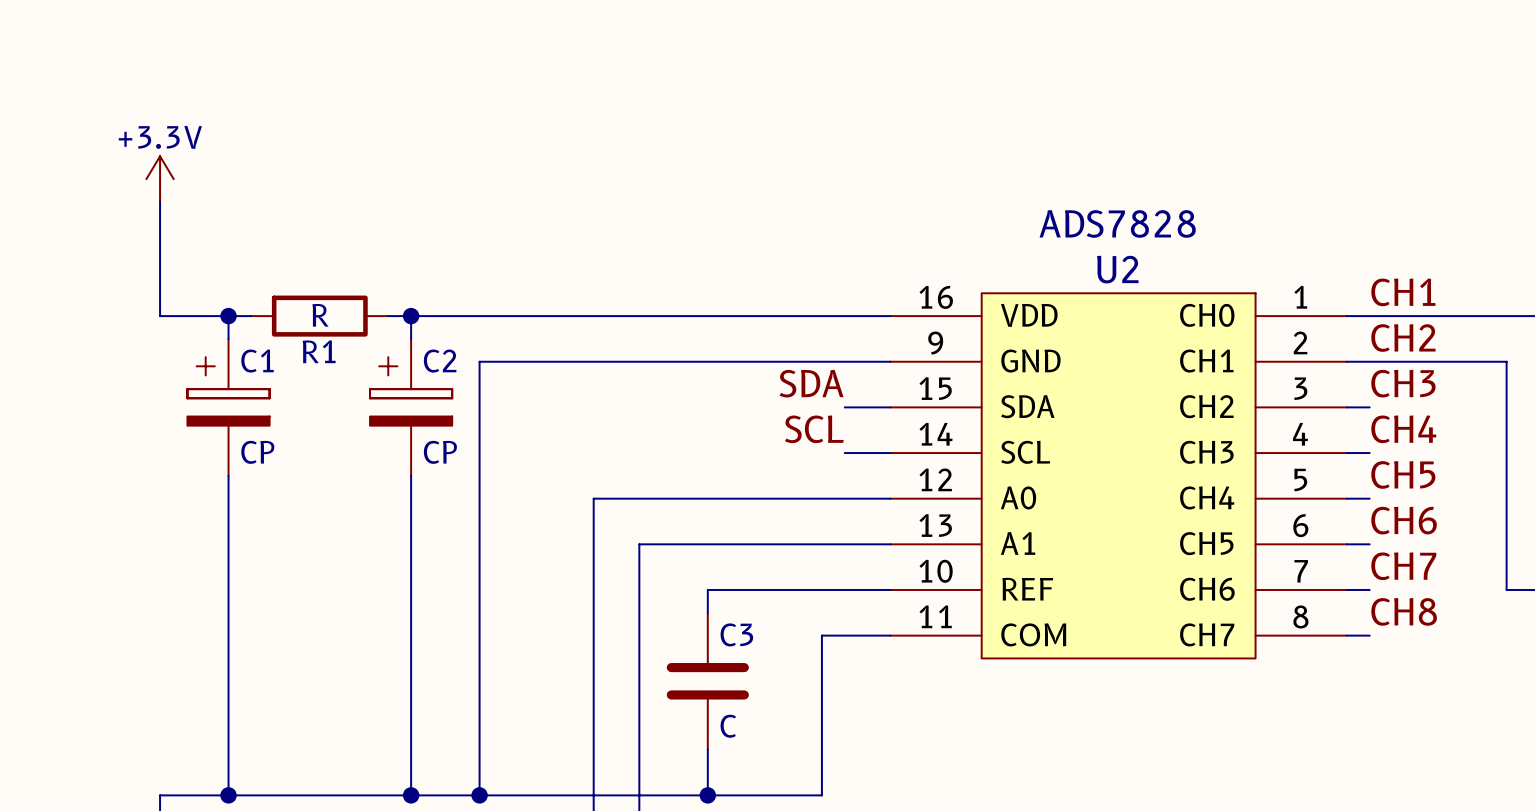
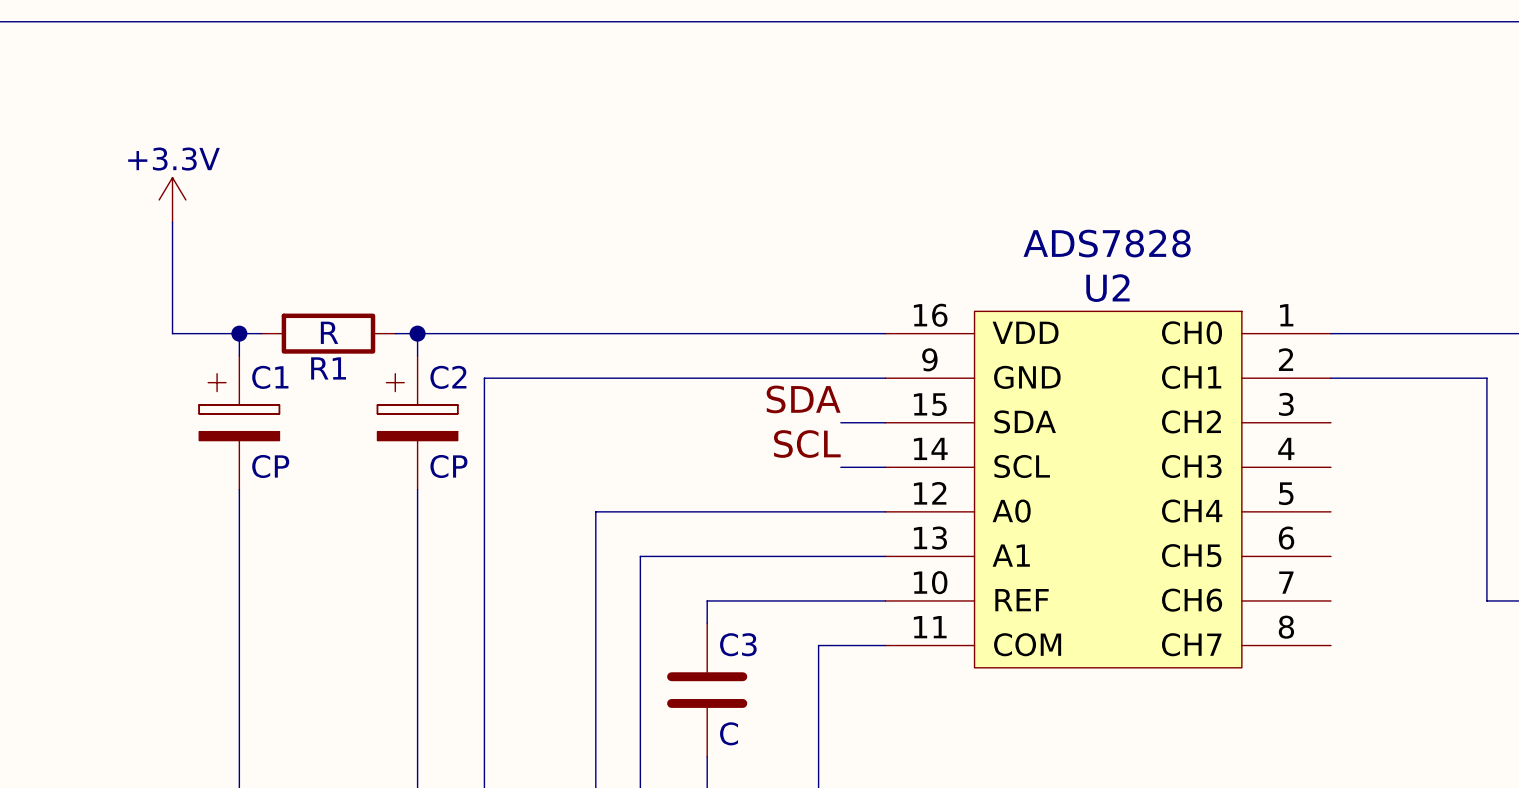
label: CH1 (1403, 292) -> none
label: CH2 (1403, 338) -> none
label: CH3 (1403, 383) -> none
wire: (1346, 407) (1369, 407) -> none
label: CH4 (1403, 429) -> none
wire: (1346, 453) (1369, 453) -> none
label: CH5 (1403, 474) -> none
wire: (1346, 498) (1369, 498) -> none
label: CH6 (1404, 520) -> none
wire: (1346, 544) (1369, 544) -> none
label: CH7 (1403, 566) -> none
wire: (1346, 589) (1369, 589) -> none
label: CH8 (1404, 611) -> none
wire: (1346, 635) (1369, 635) -> none

